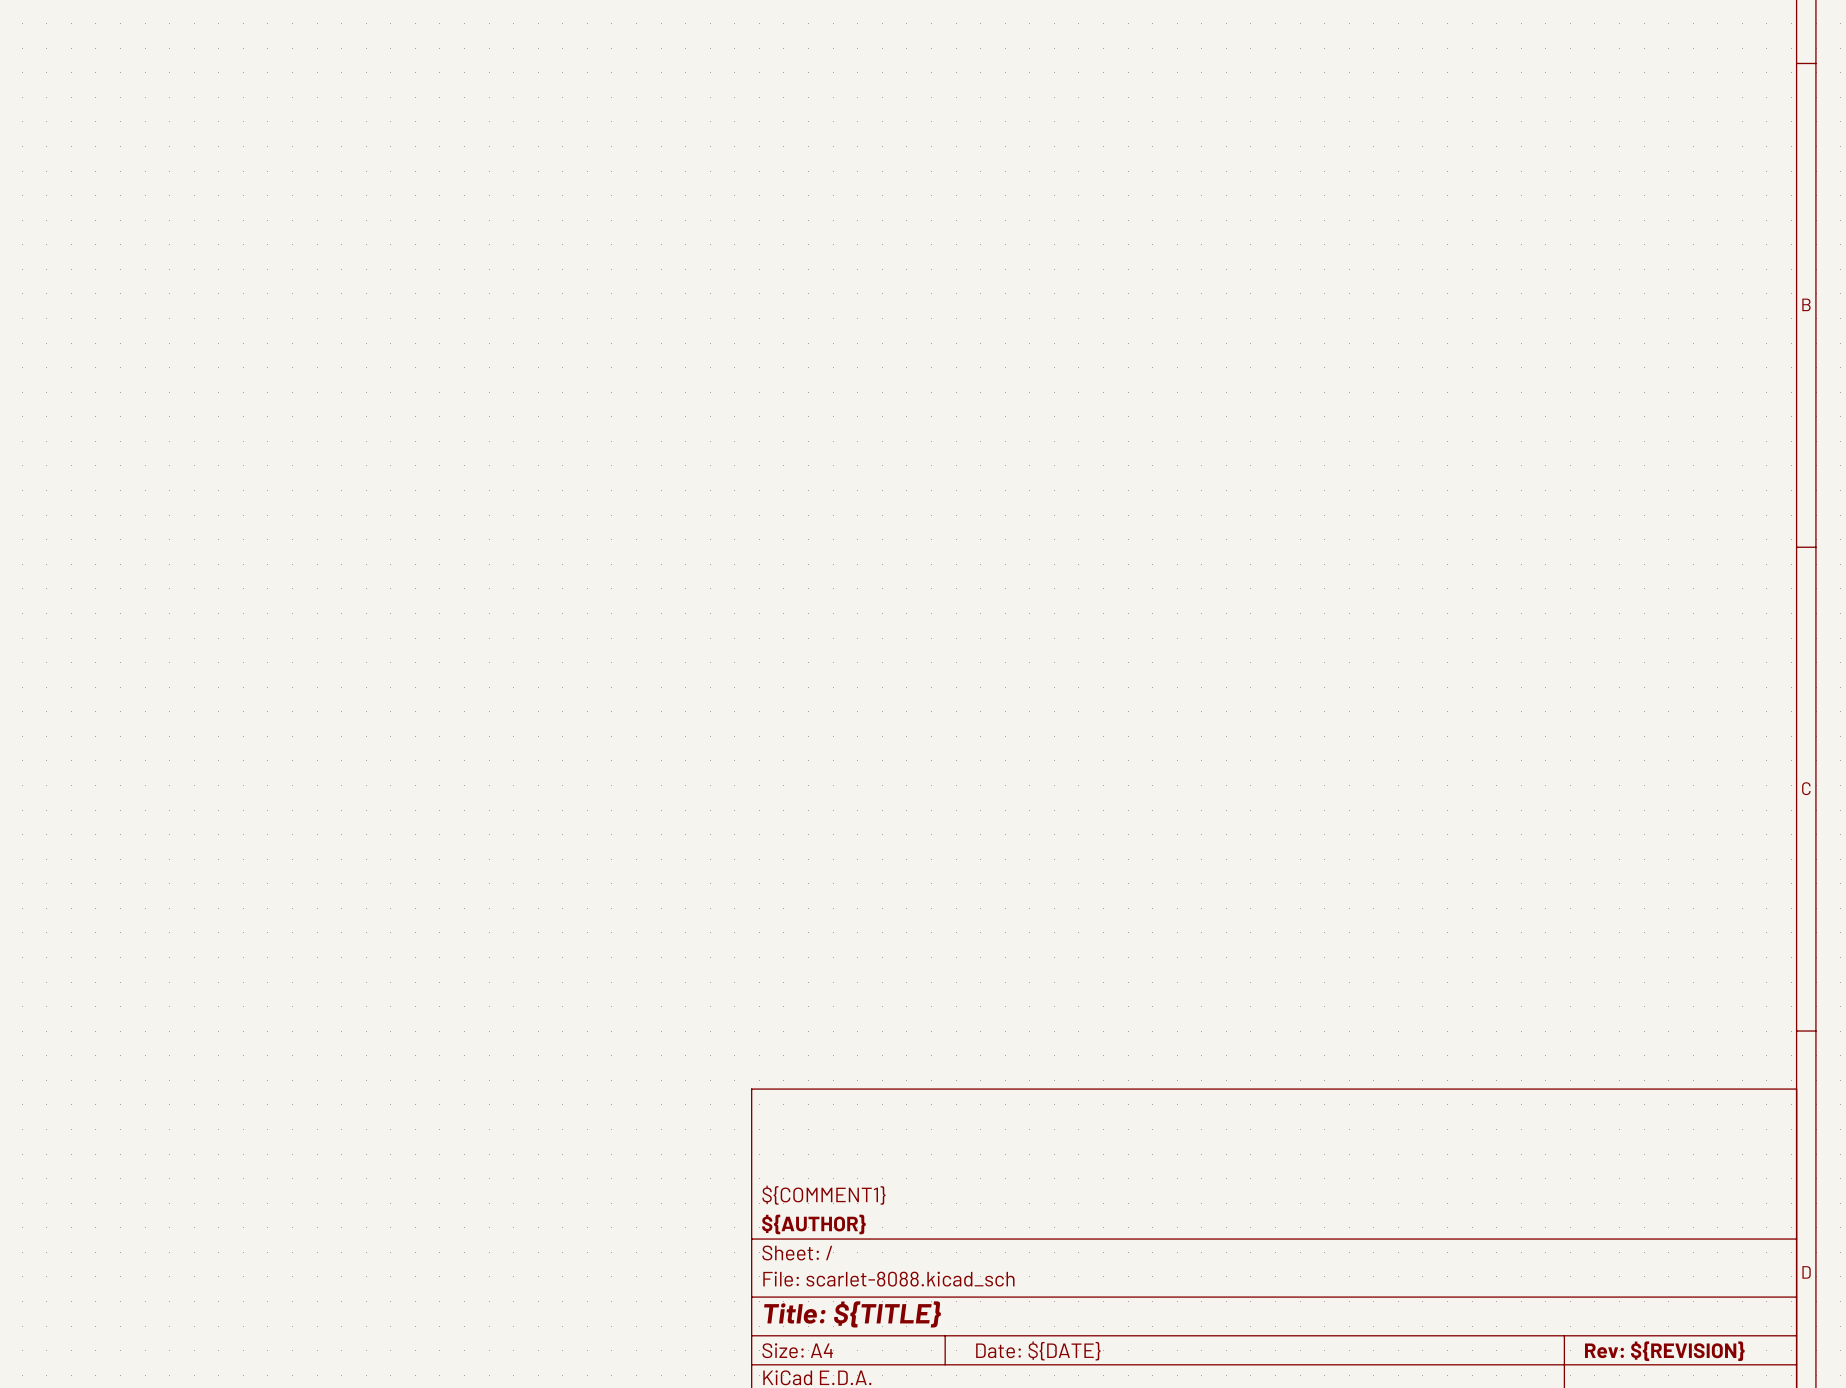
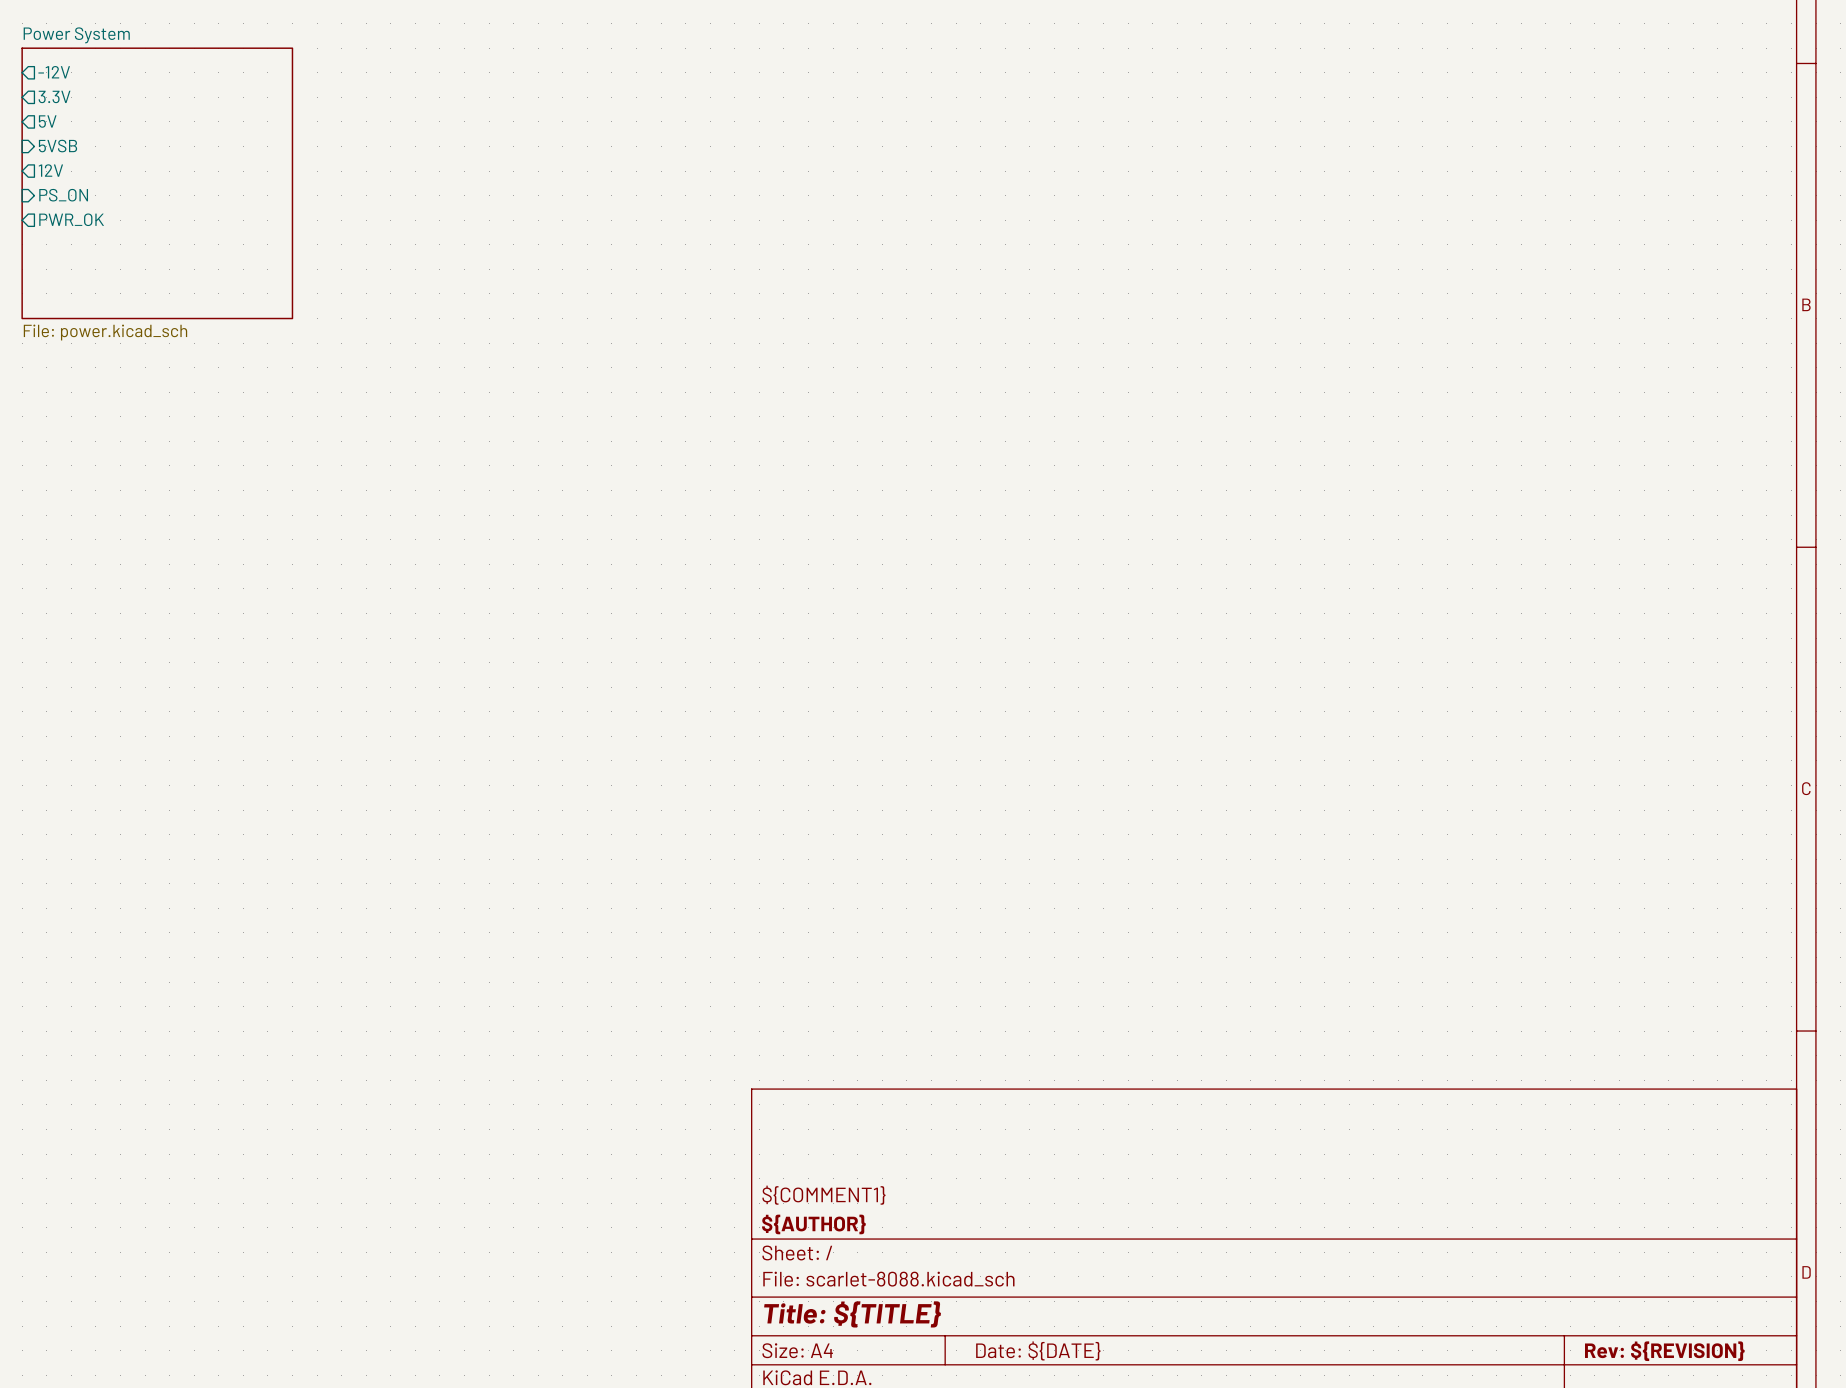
sheet pin: none -> -12V (54, 72)
sheet pin: none -> 3.3V (54, 96)
sheet pin: none -> 5V (47, 121)
sheet pin: none -> 5VSB (58, 146)
sheet pin: none -> 12V (50, 170)
sheet Power System: none -> File: power.kicad_sch (157, 183)
sheet pin: none -> PS_ON (63, 195)
sheet pin: none -> PWR_OK (71, 219)

